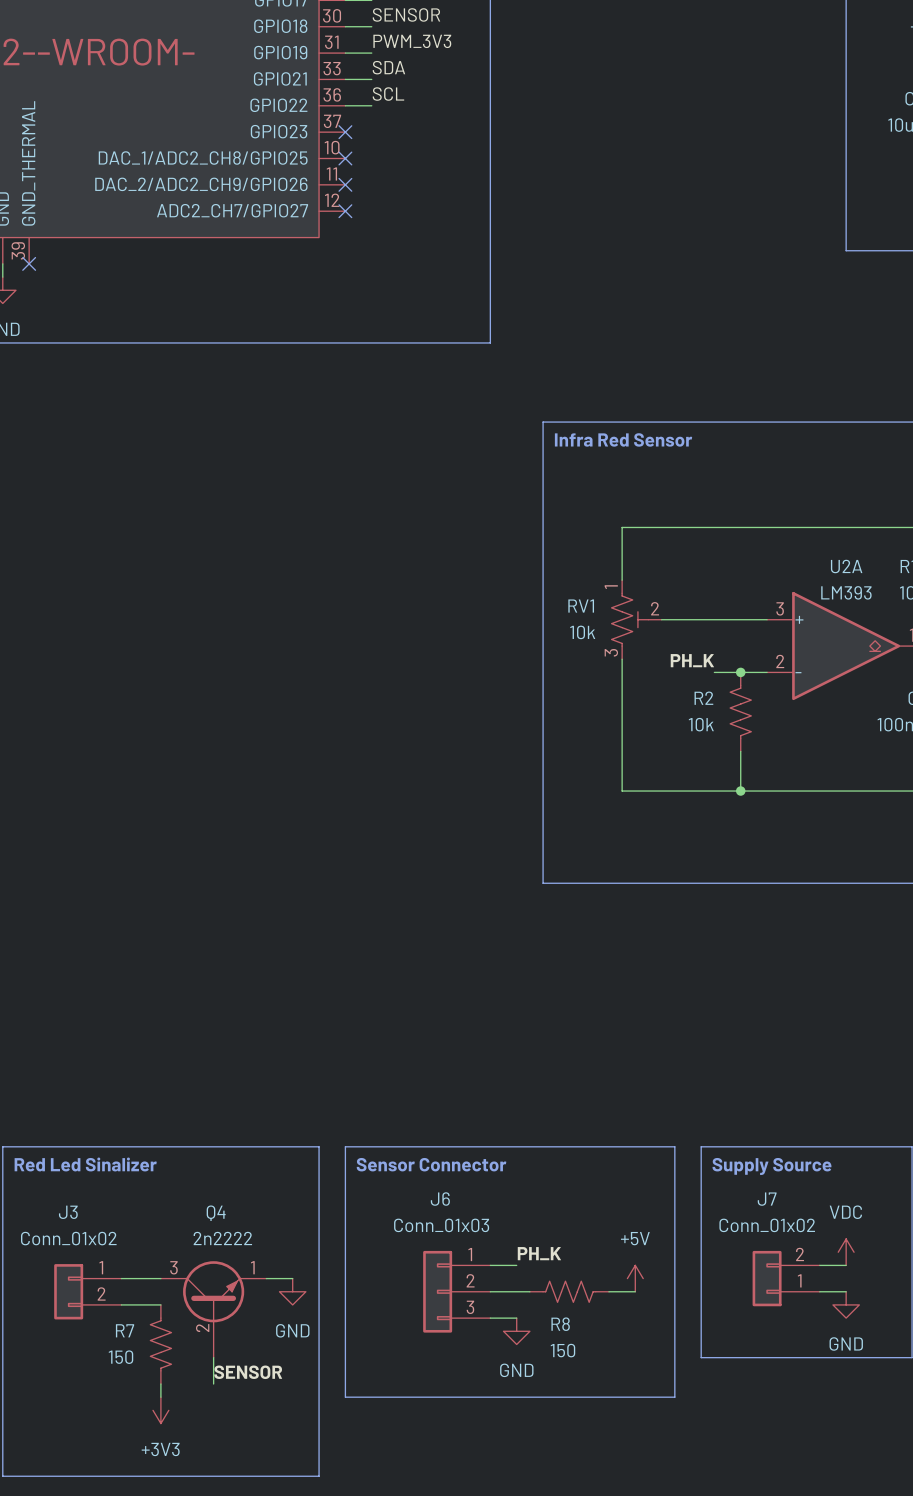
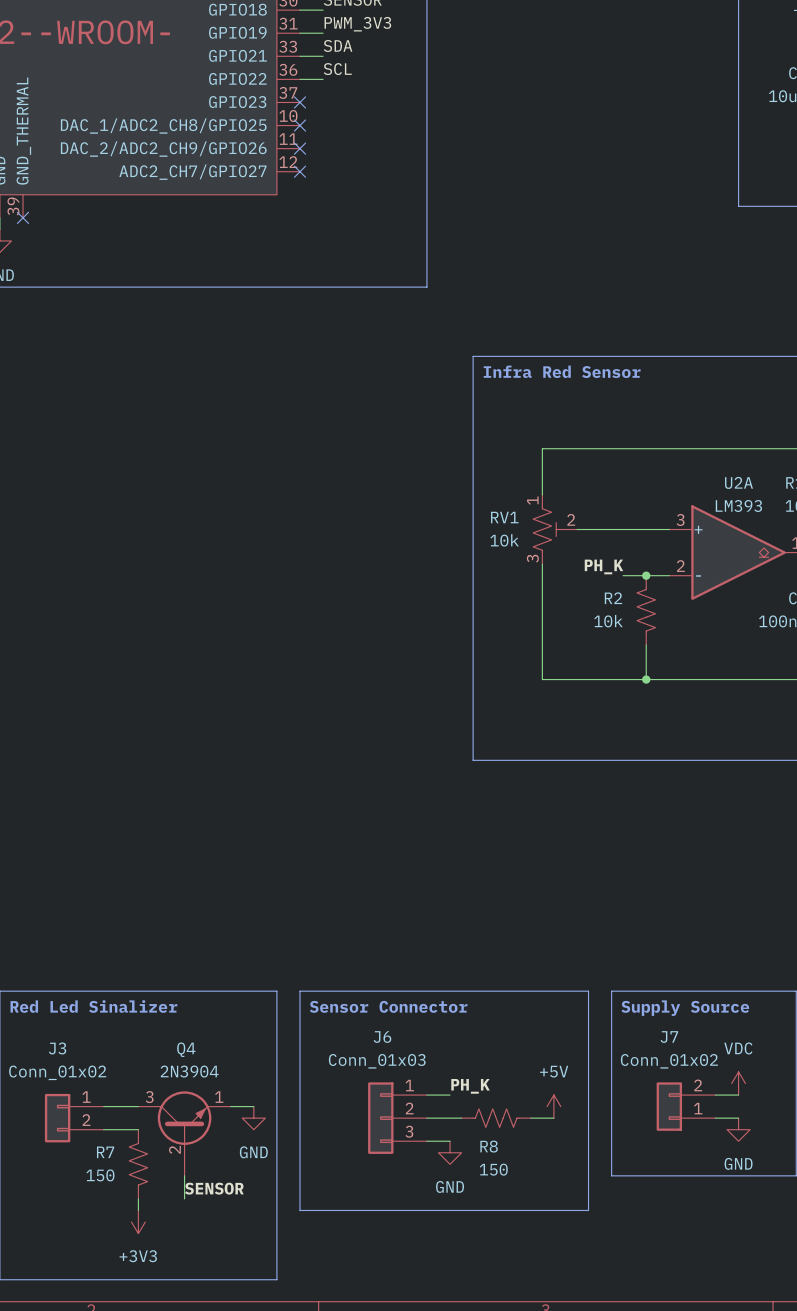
Q4 value: 2n2222 (222, 1238) -> 2N3904 (189, 1071)

